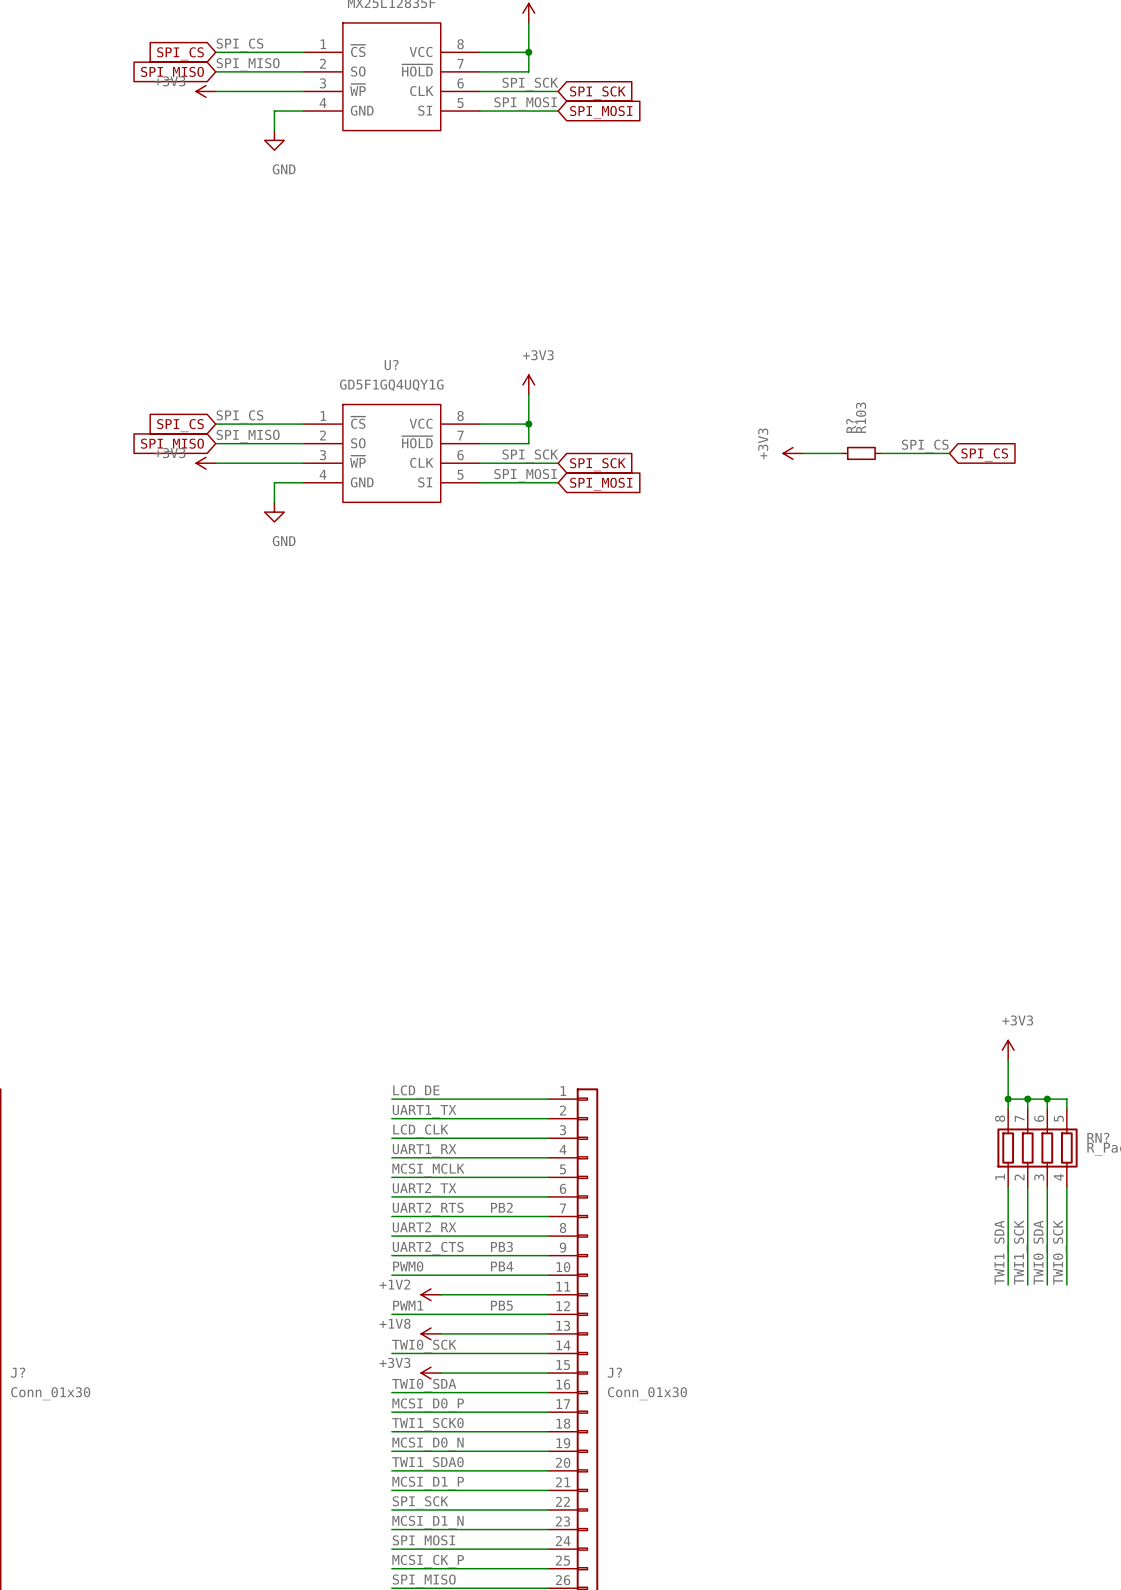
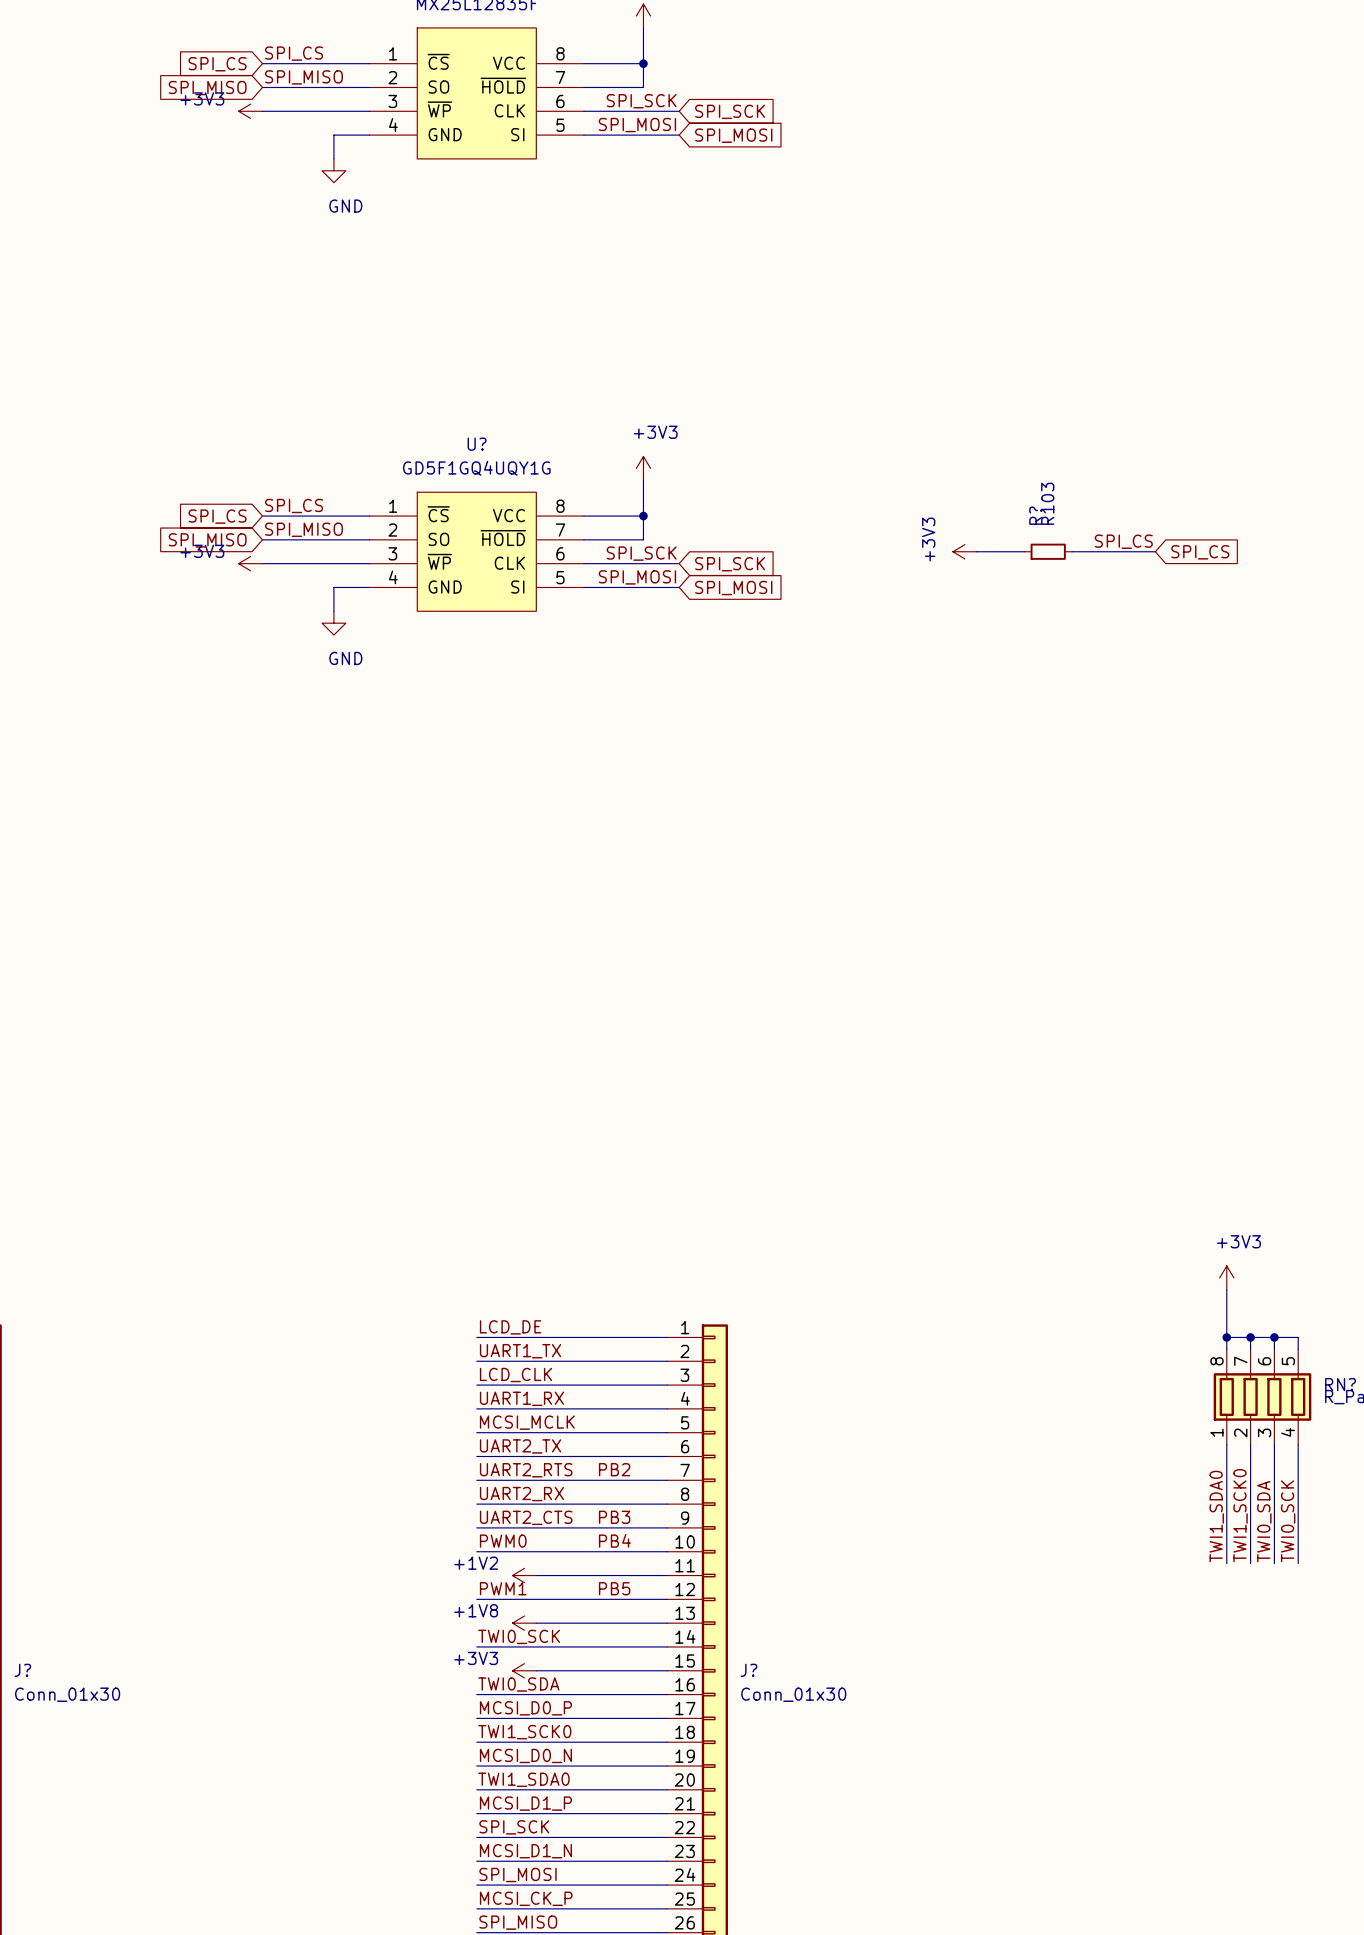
label: TWI1_SDA (1000, 1252) -> TWI1_SDA0 (1216, 1516)
label: TWI1_SCK (1020, 1252) -> TWI1_SCK0 (1240, 1515)

